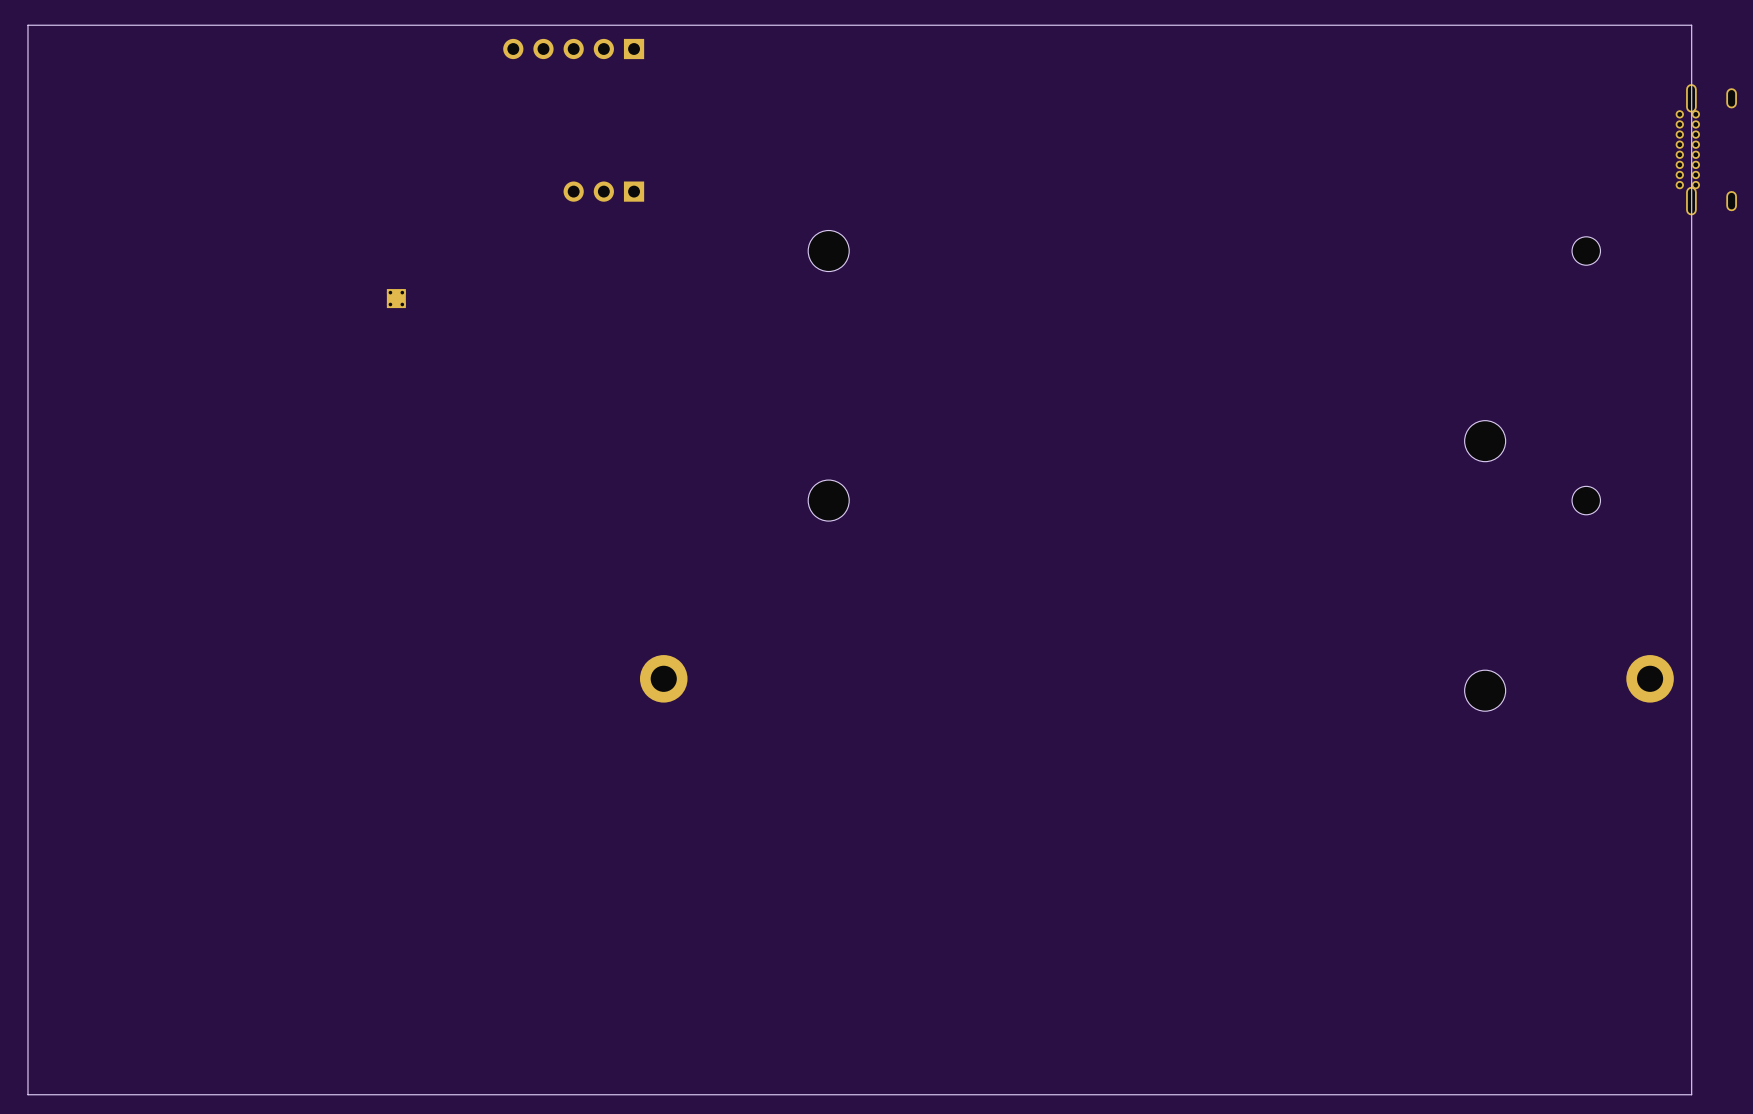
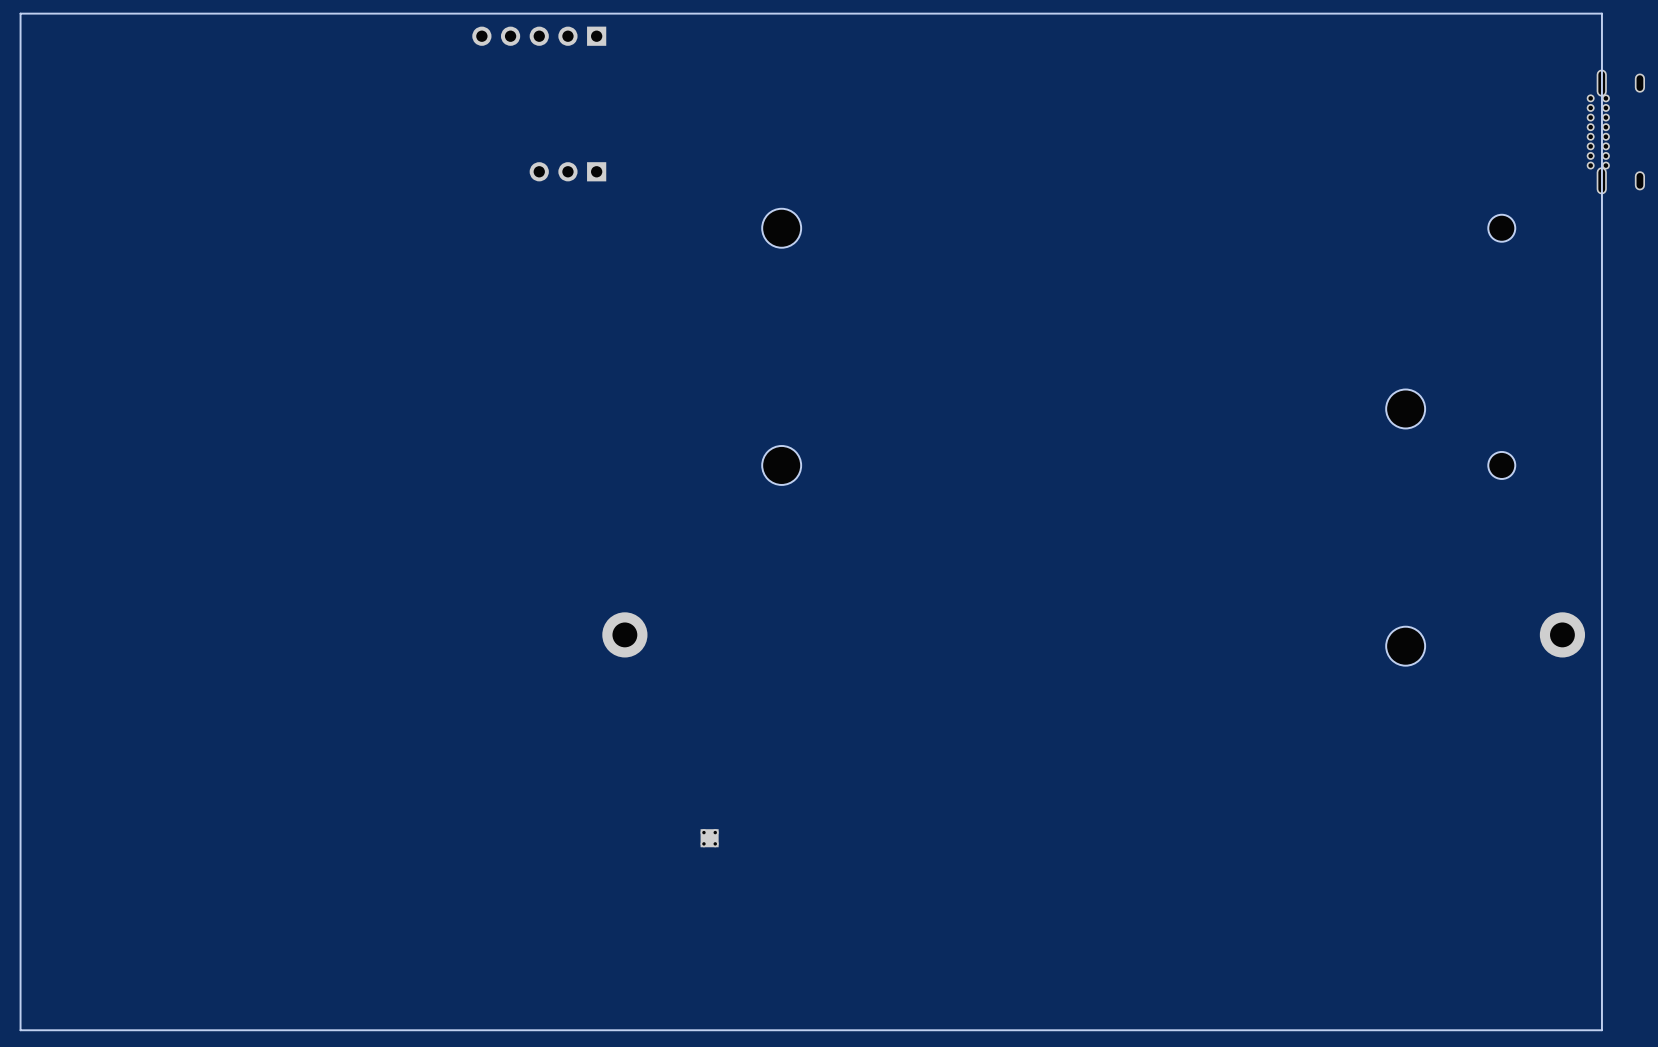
part: (396, 298) -> none
part: none -> (709, 838)

